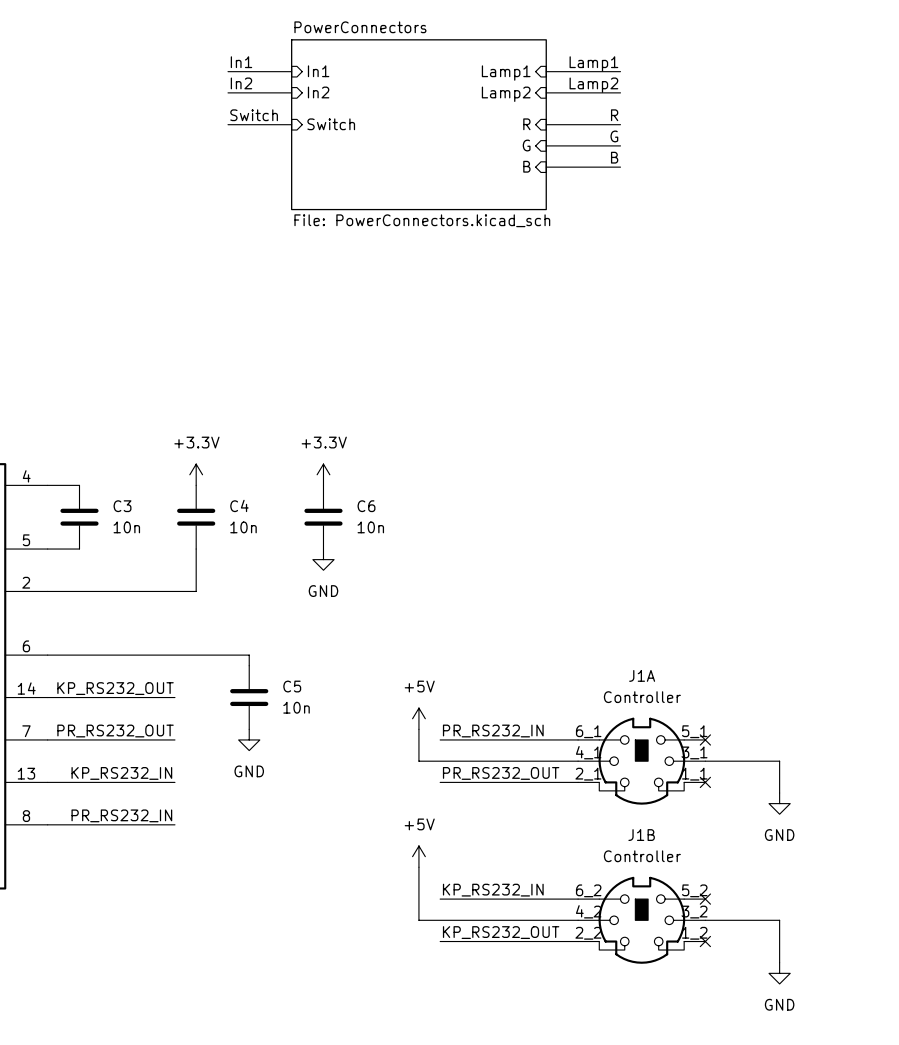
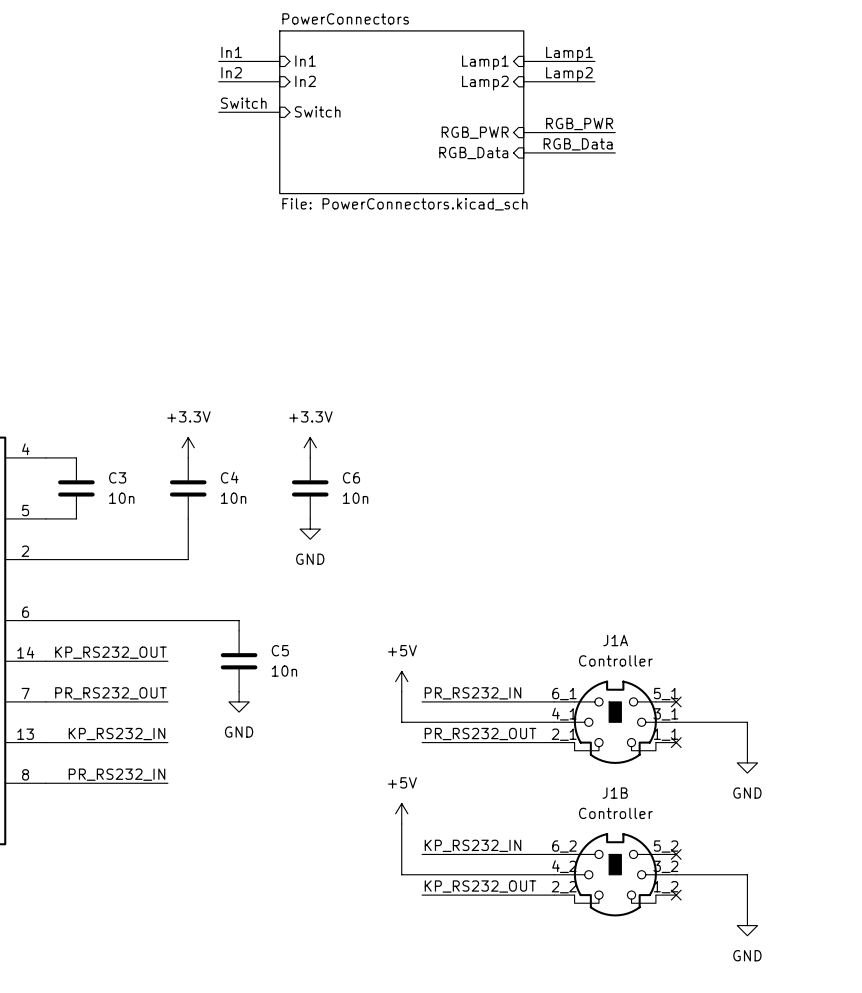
label: R (614, 115) -> none
sheet pin: R (526, 124) -> none
wire: (546, 124) (620, 124) -> none
label: none -> RGB_PWR (579, 124)
label: G (614, 136) -> none
sheet pin: G (526, 145) -> RGB_PWR (475, 132)
wire: none -> (594, 132) (615, 132)
label: B (614, 157) -> none
label: none -> RGB_Data (578, 144)
sheet pin: B (526, 166) -> RGB_Data (473, 153)
wire: none -> (594, 152) (615, 152)

